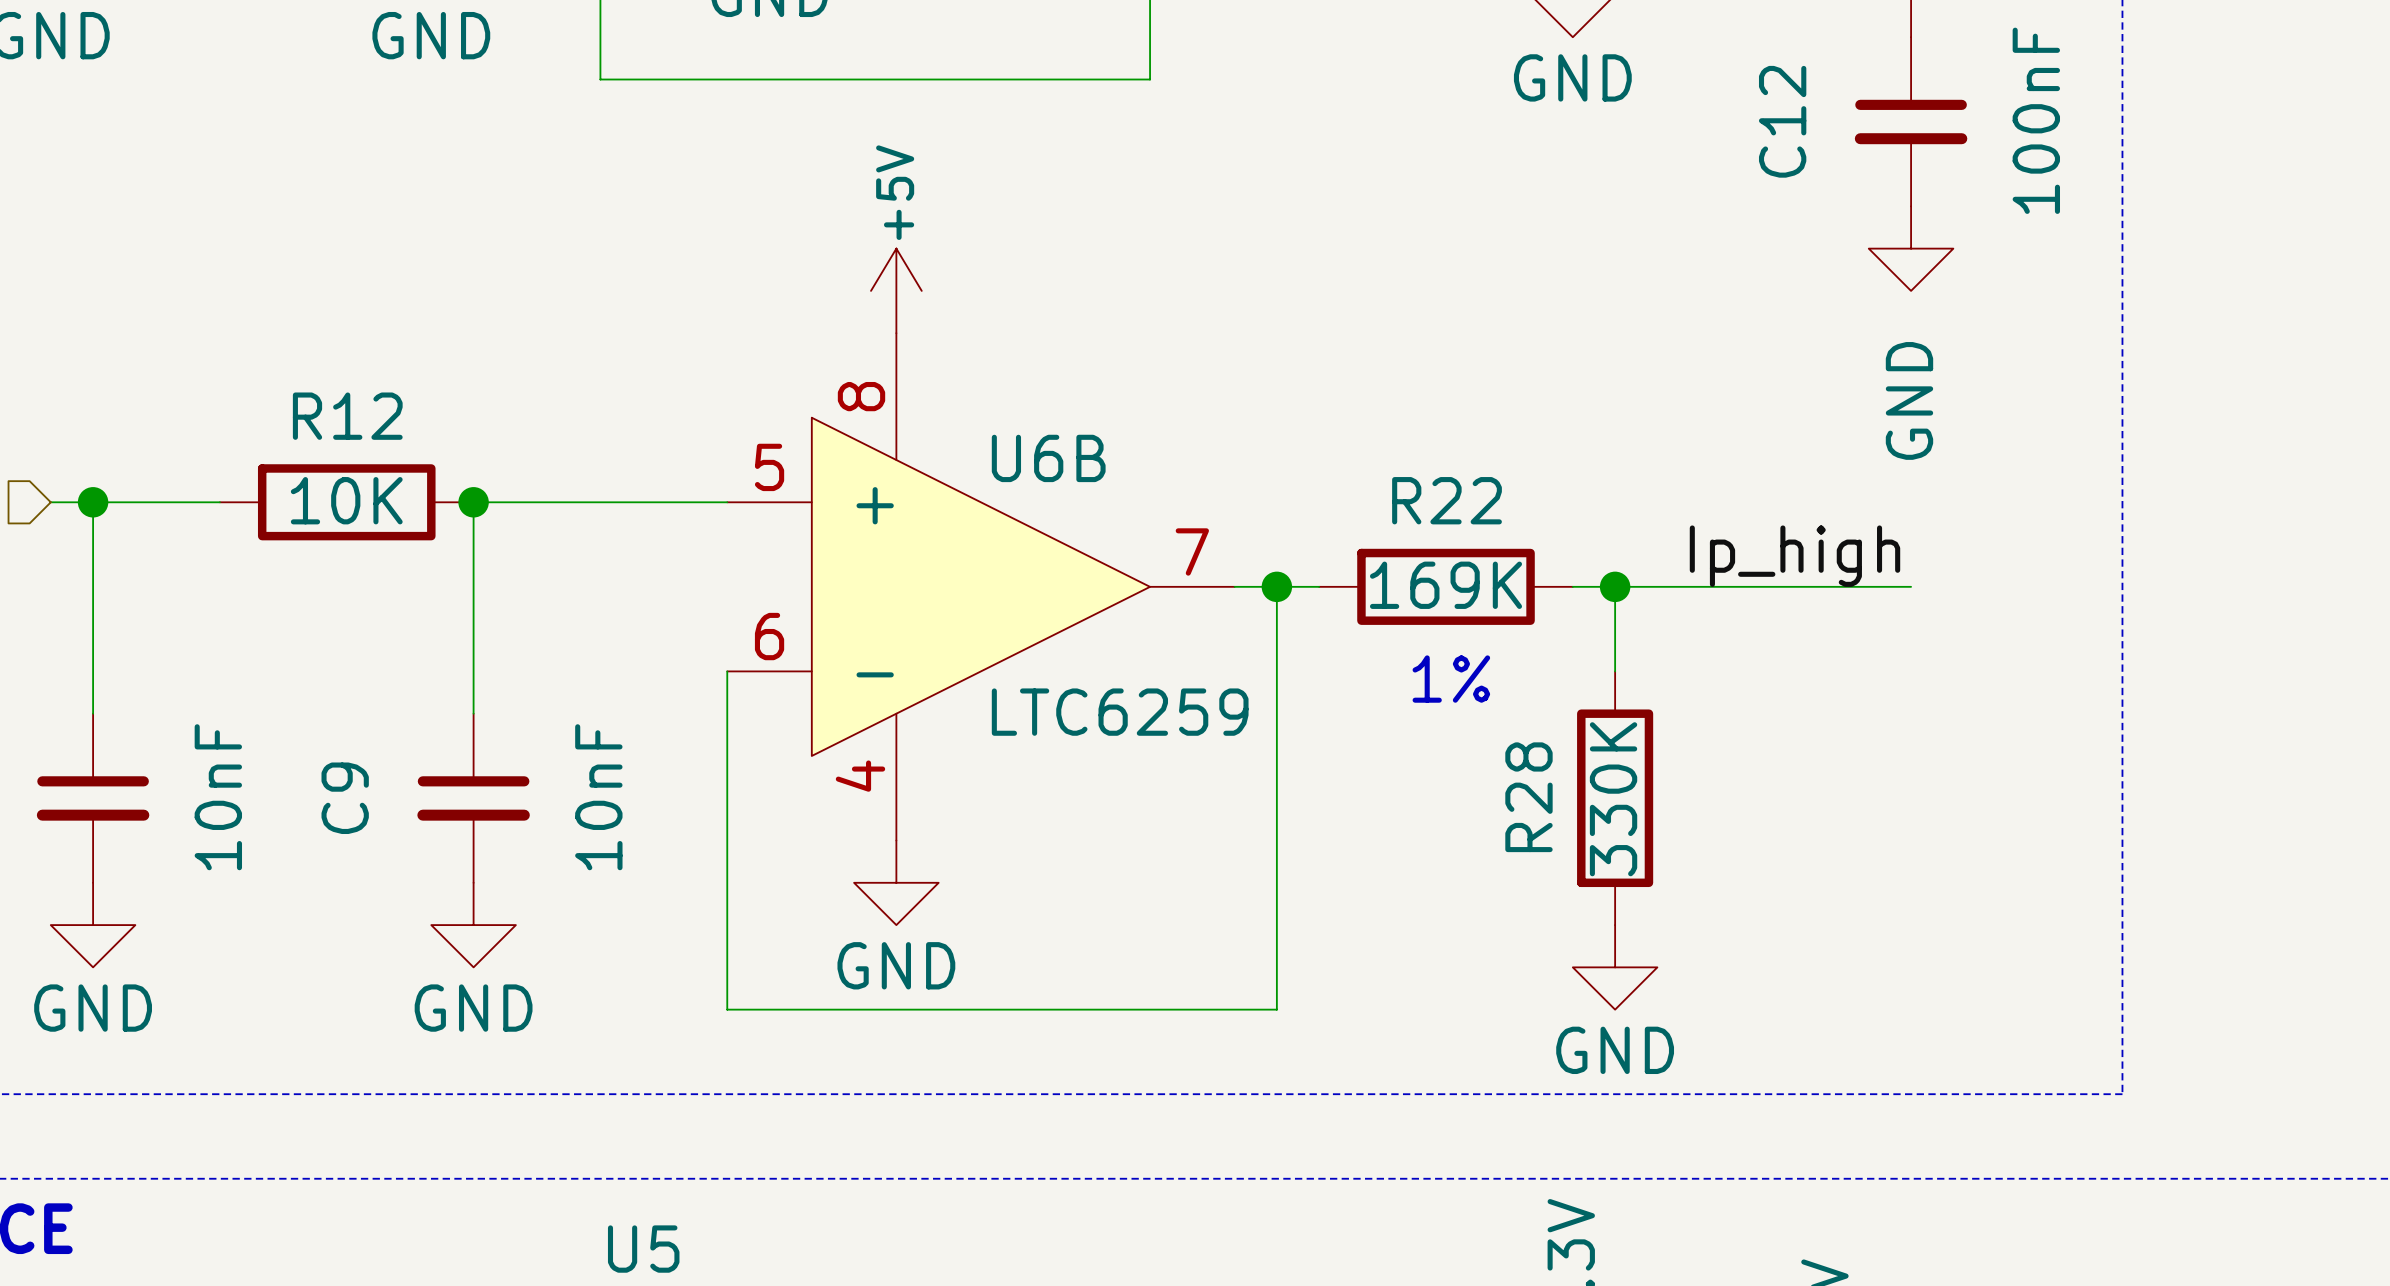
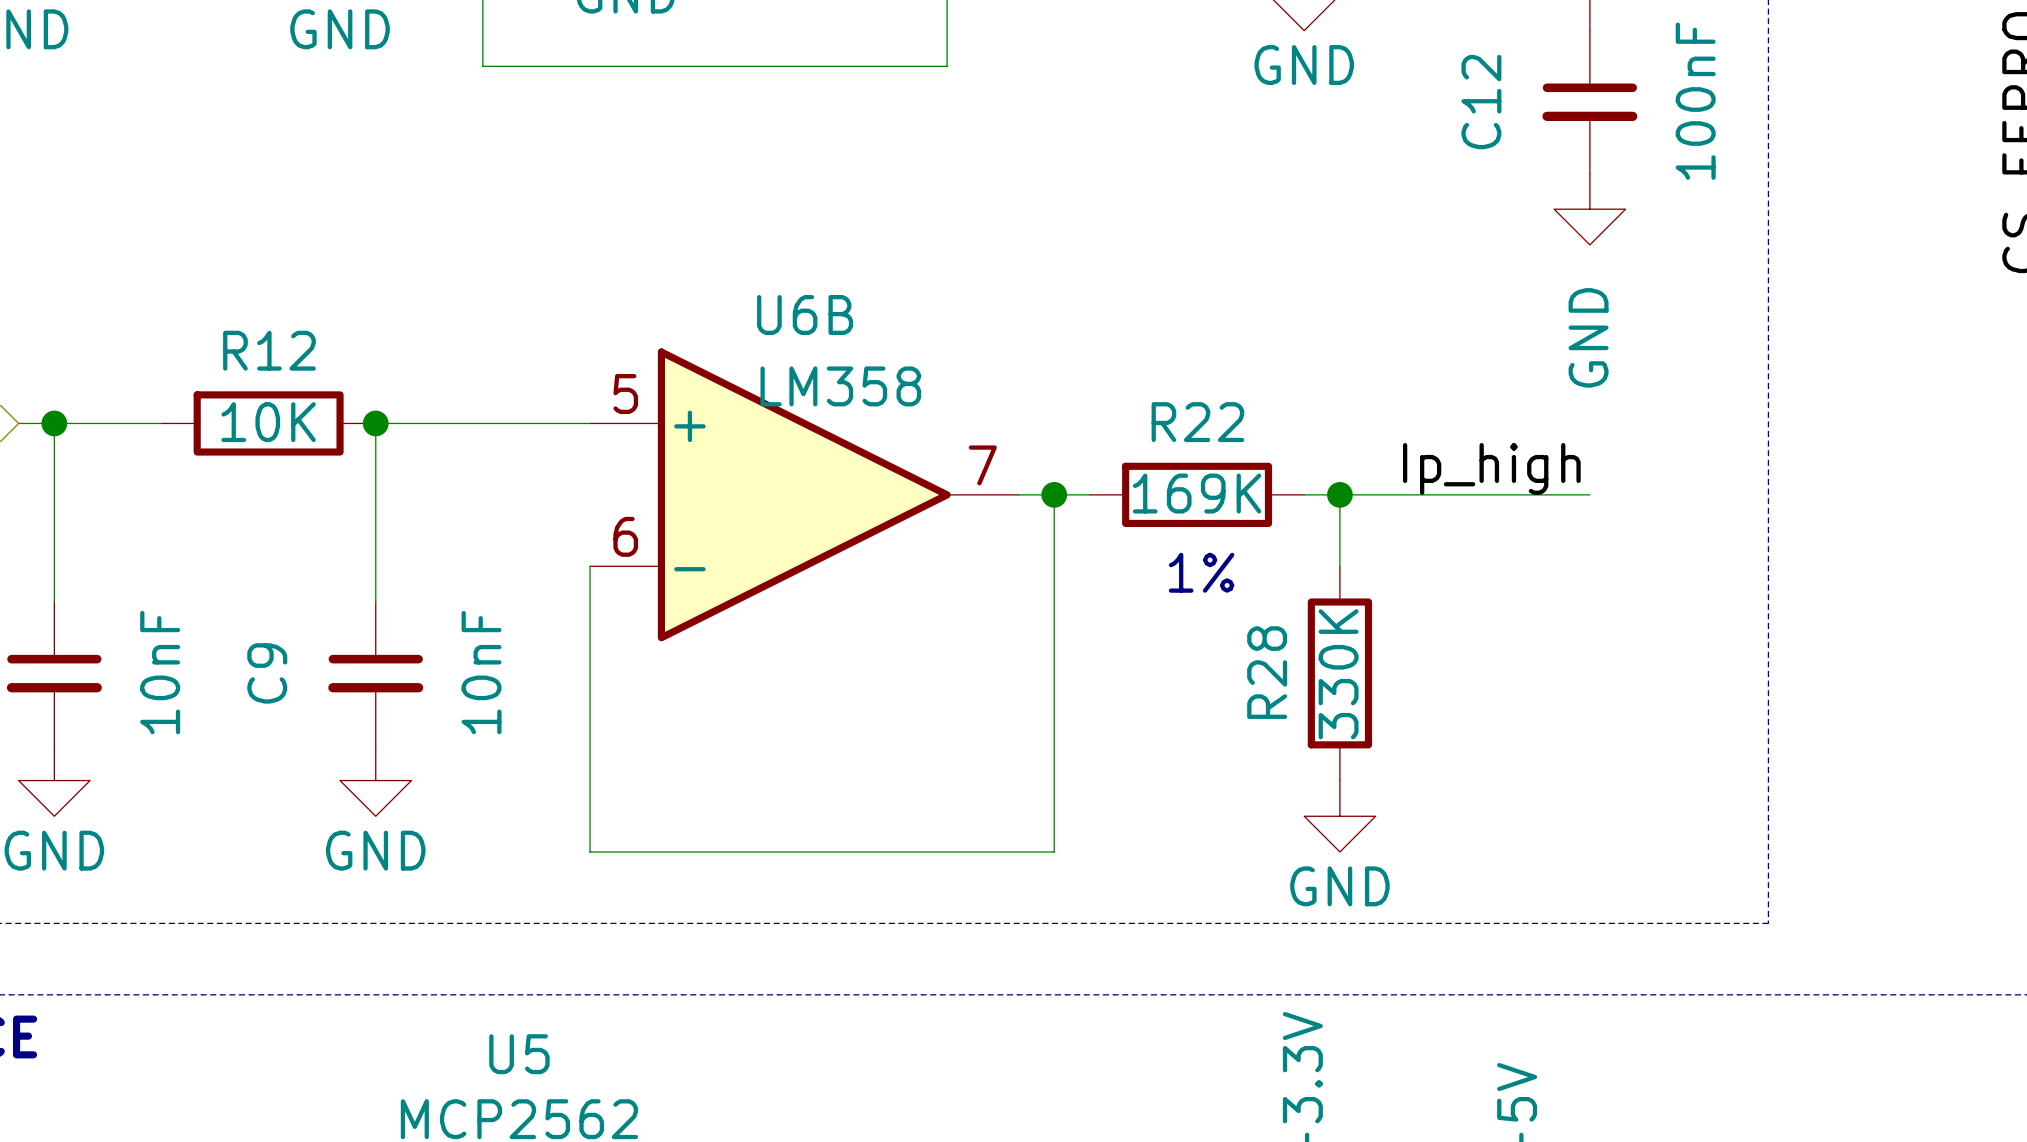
power symbol: +5V (896, 290) -> none
U6B symbol: [727, 333, 1235, 841] -> [590, 348, 1019, 642]
U6B name position: U6B (1048, 458) -> U6B (805, 314)
U6B value: LTC6259 (1120, 712) -> LM358 (840, 386)
power symbol: GND (896, 882) -> none

